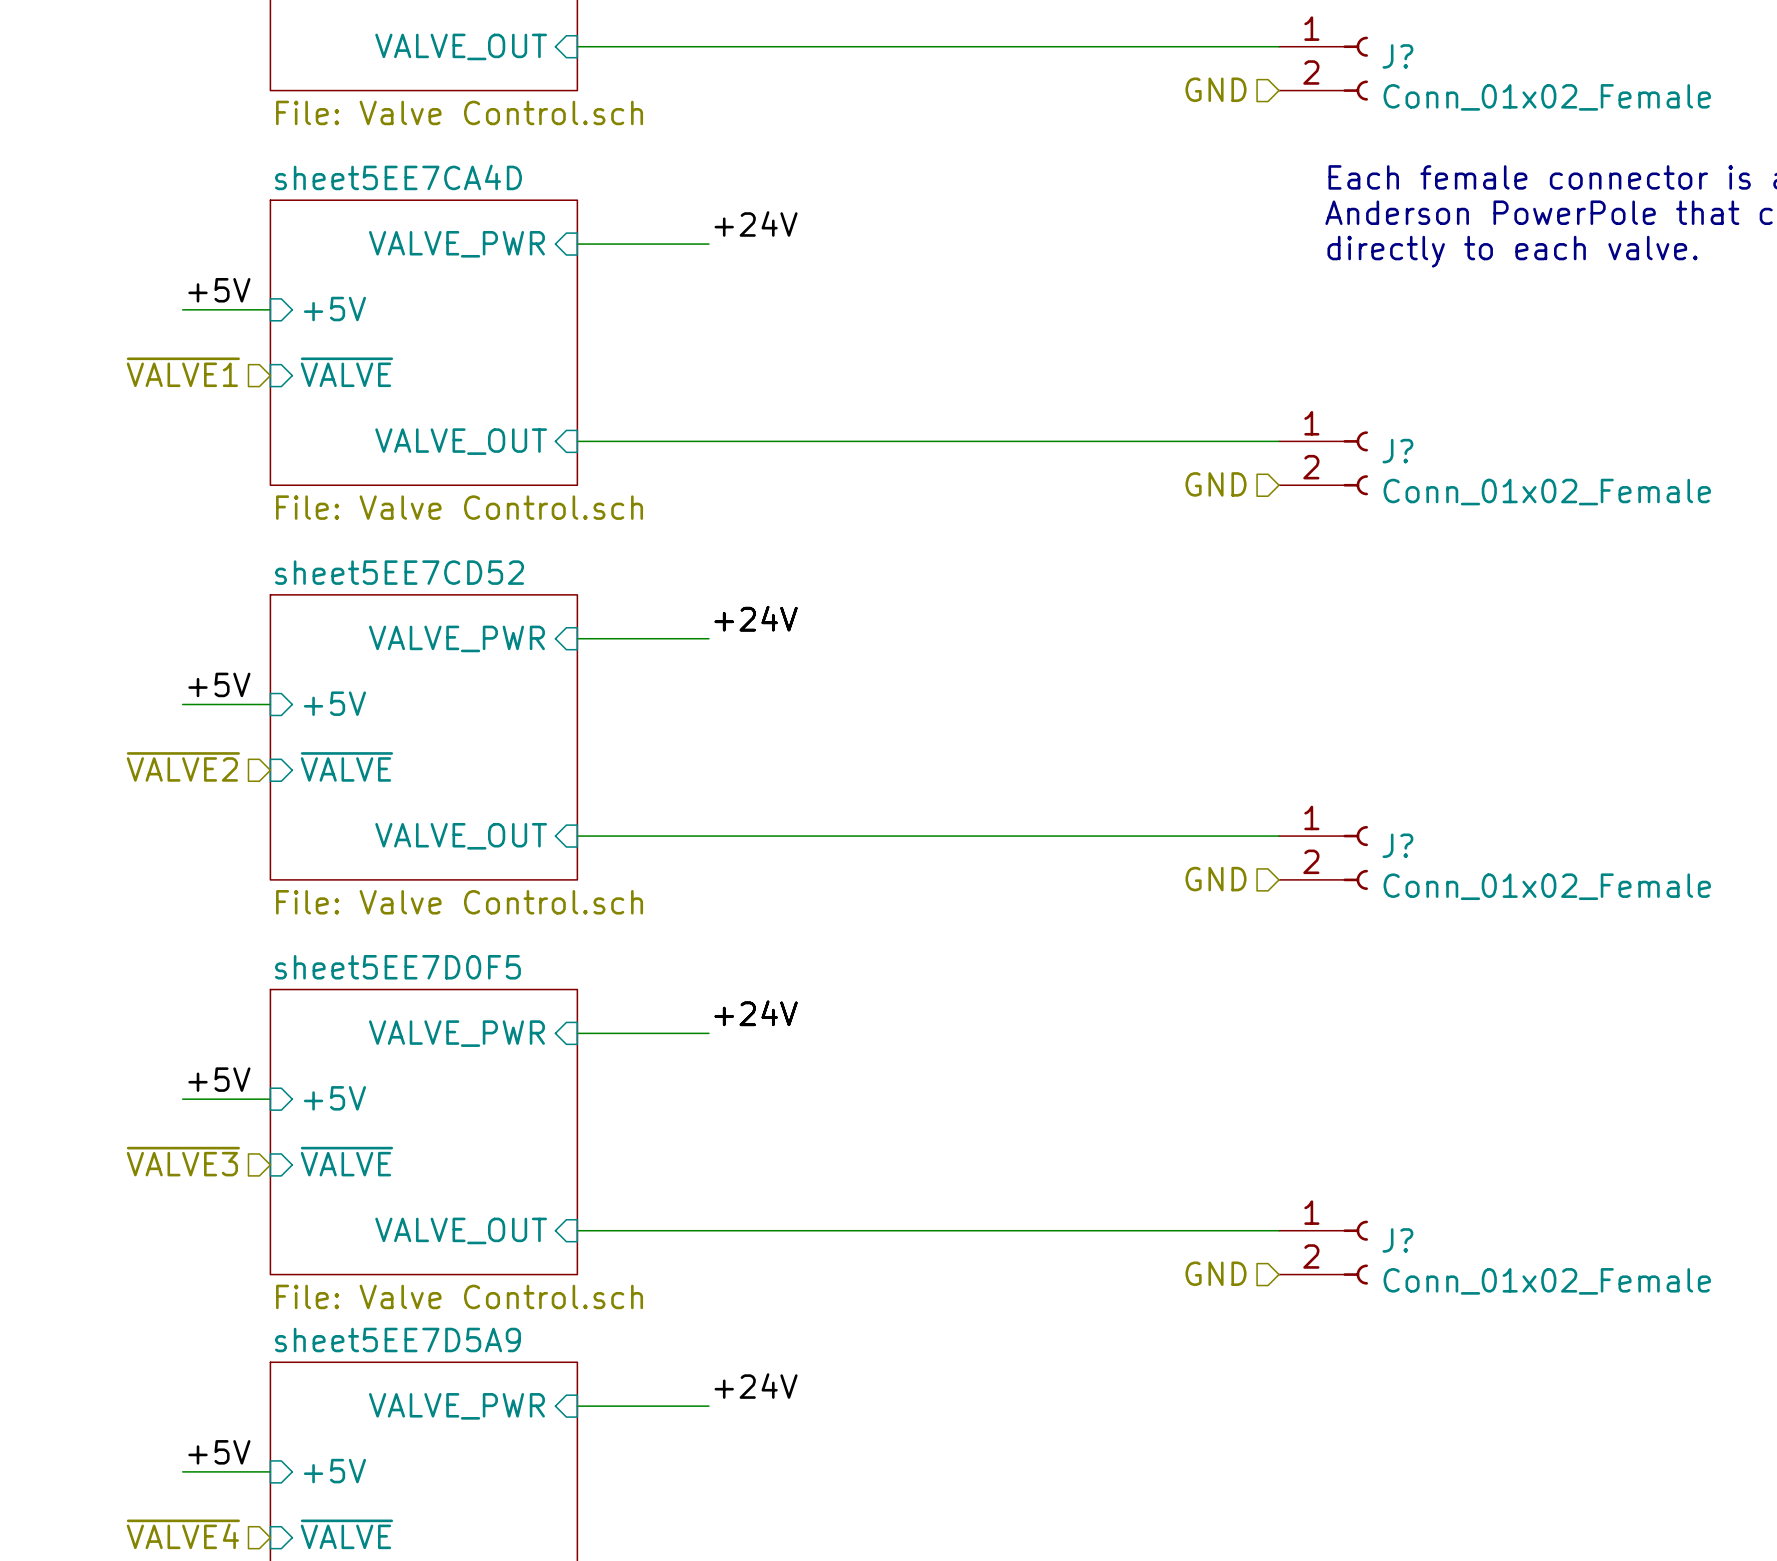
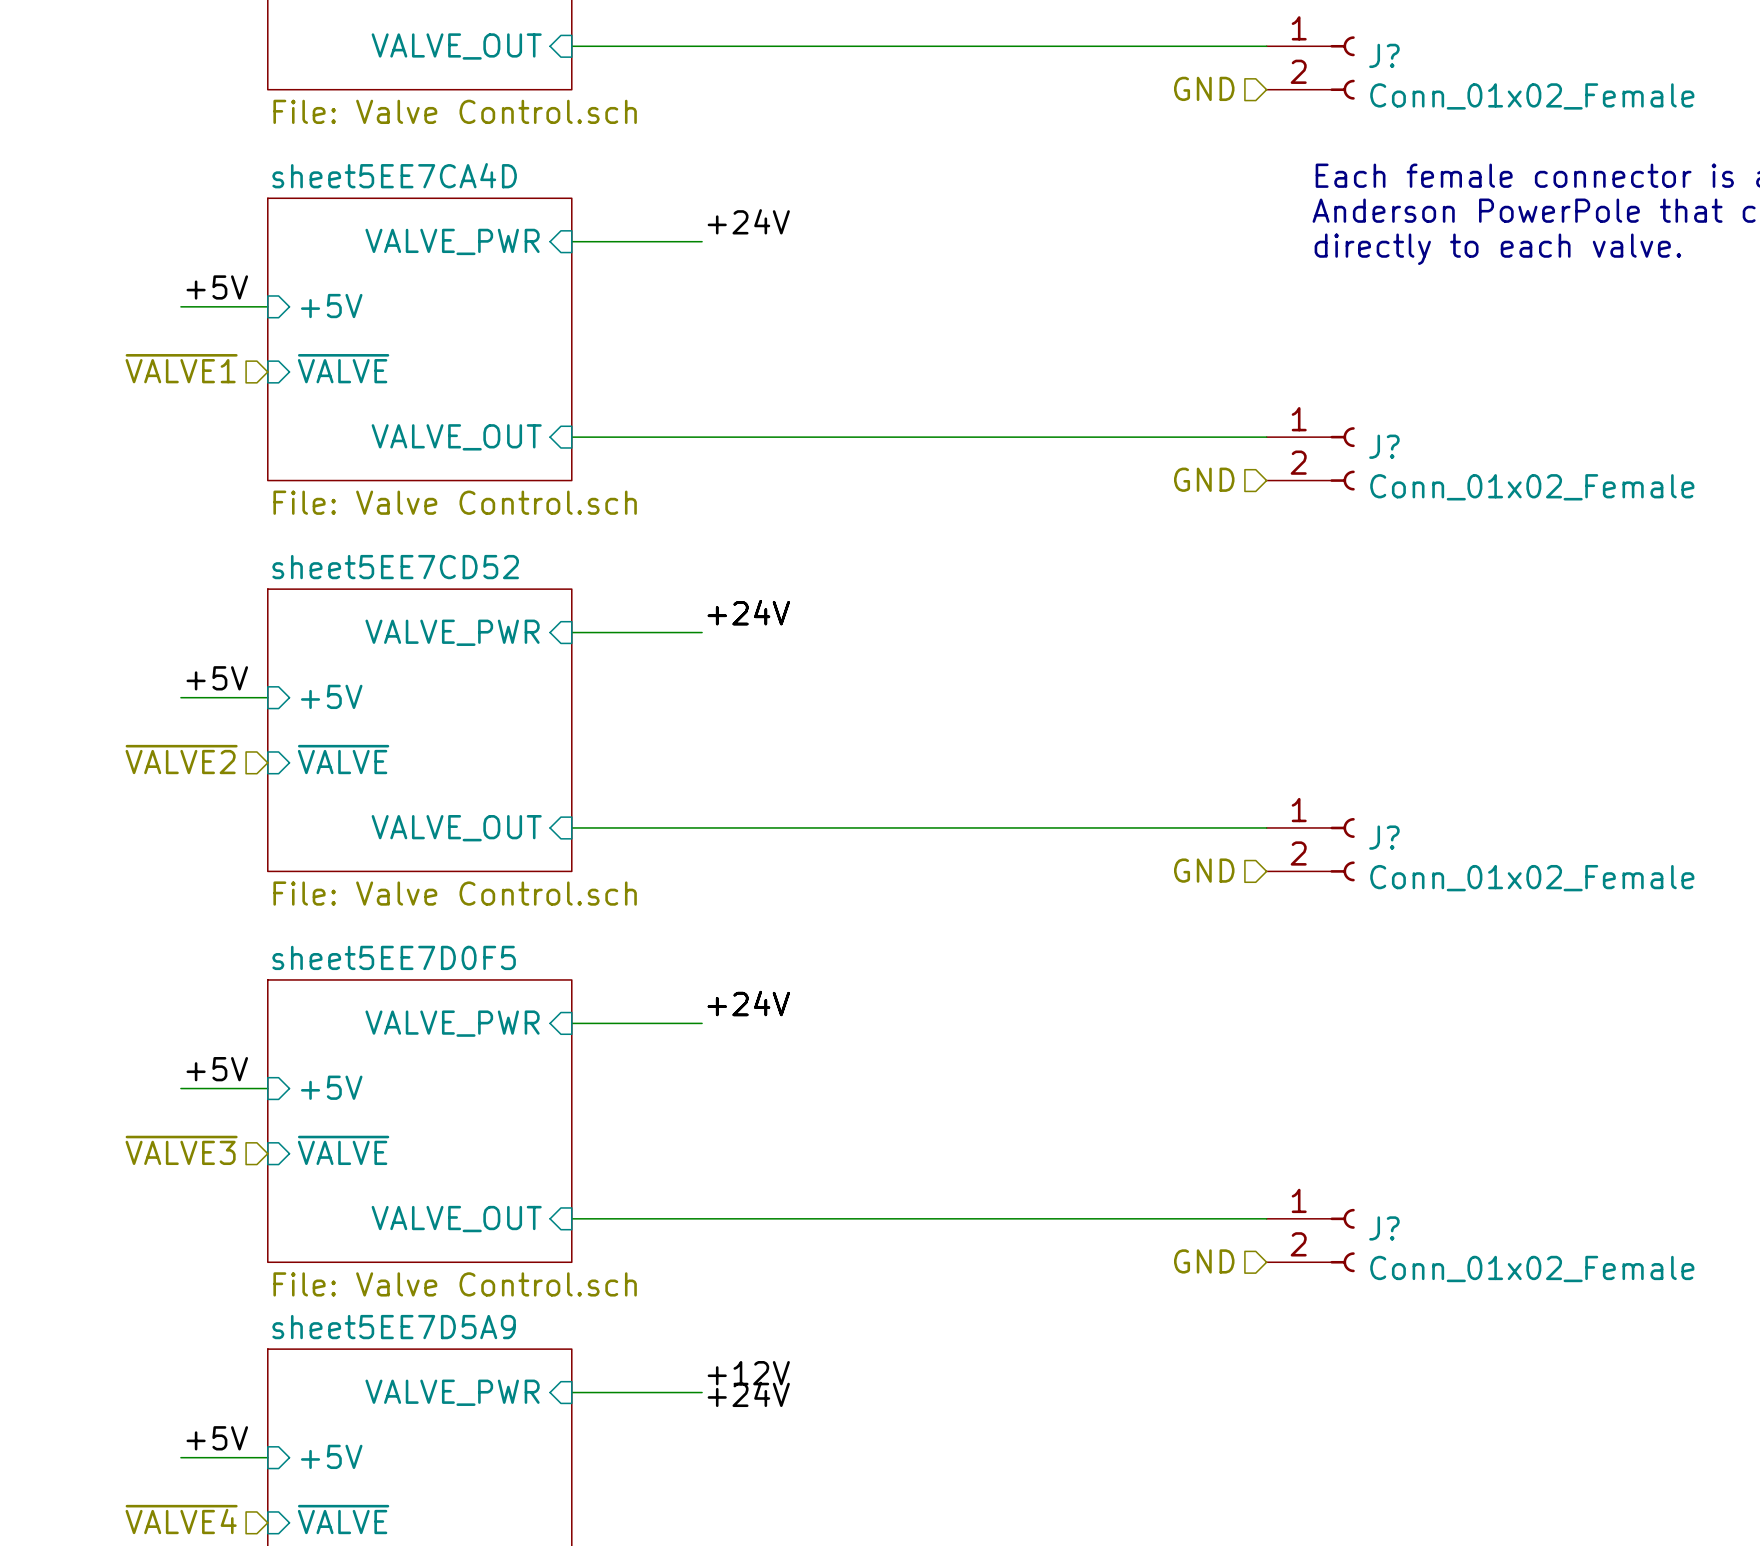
label: +24V (756, 1386) -> +12V (748, 1373)
label: none -> +24V (748, 1394)

